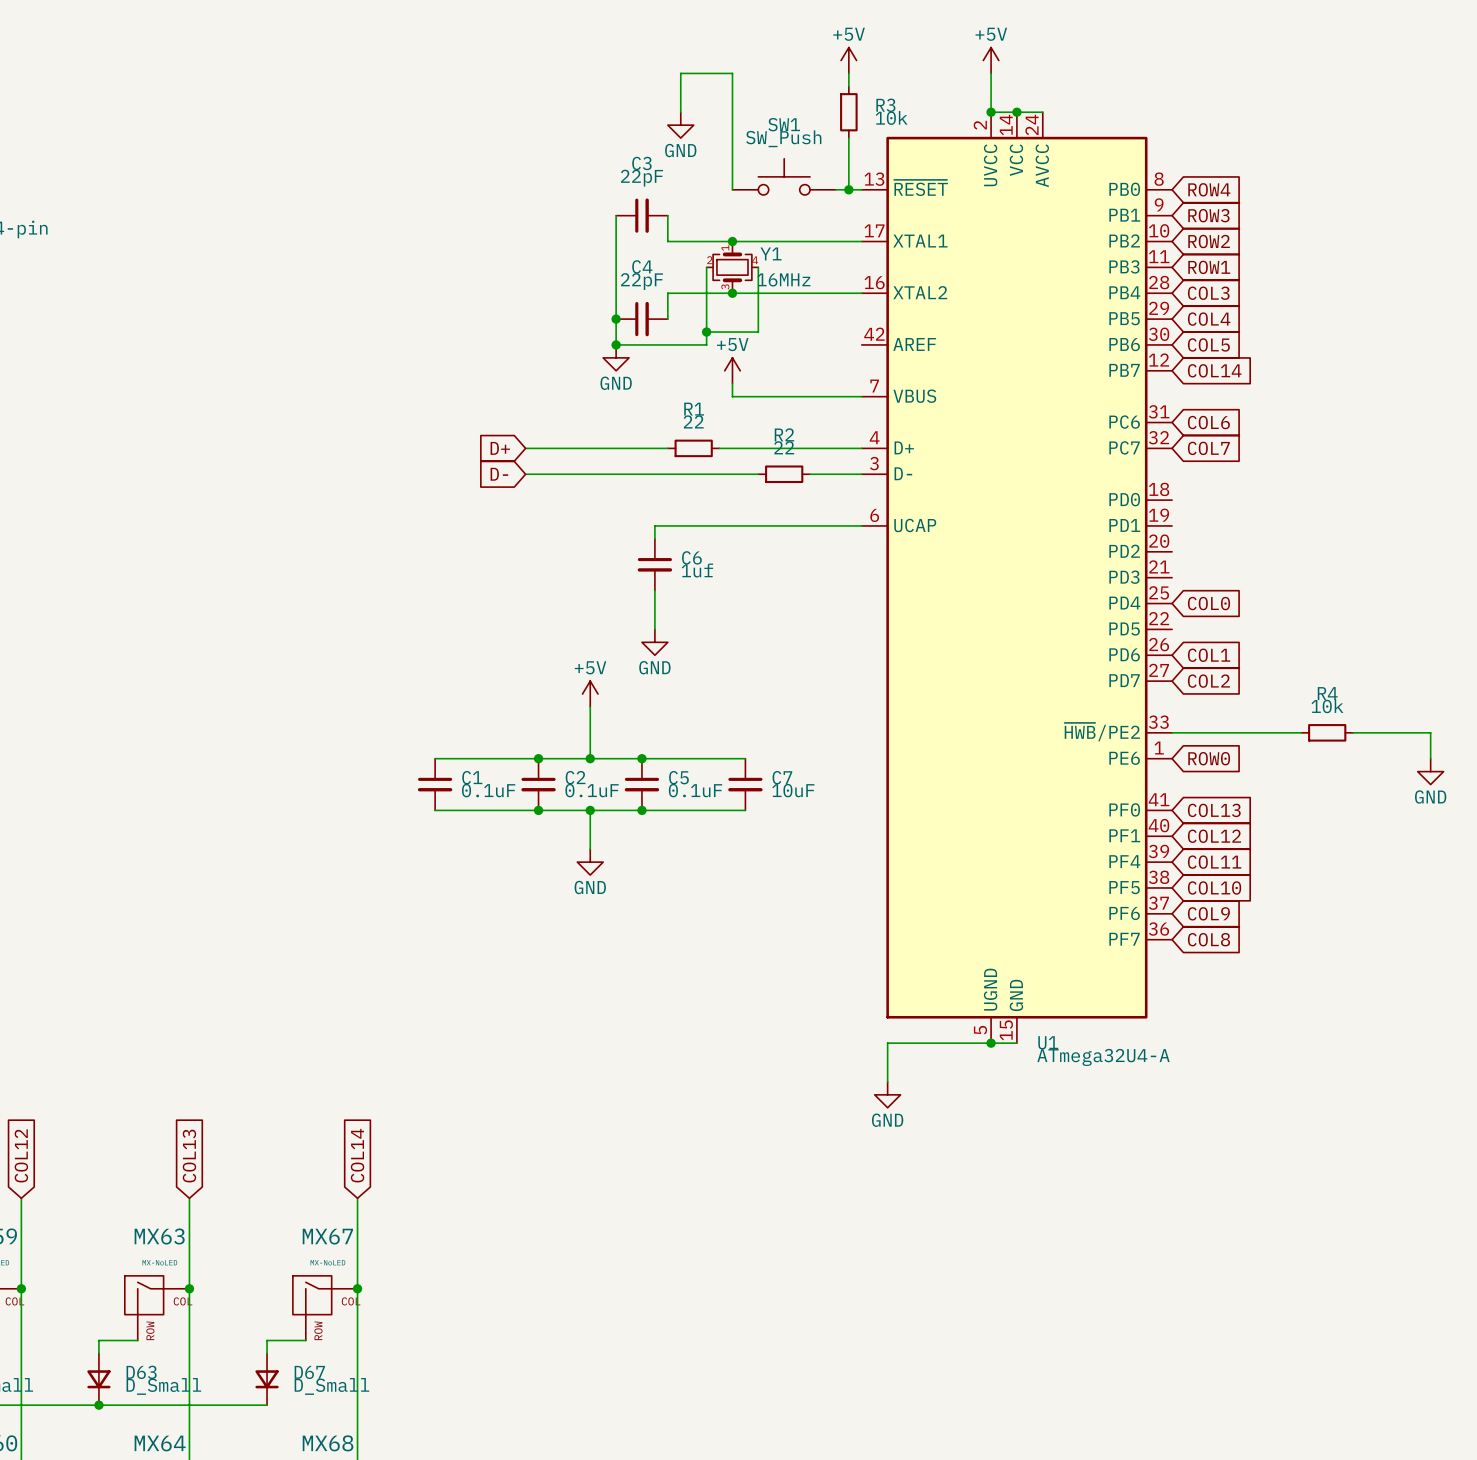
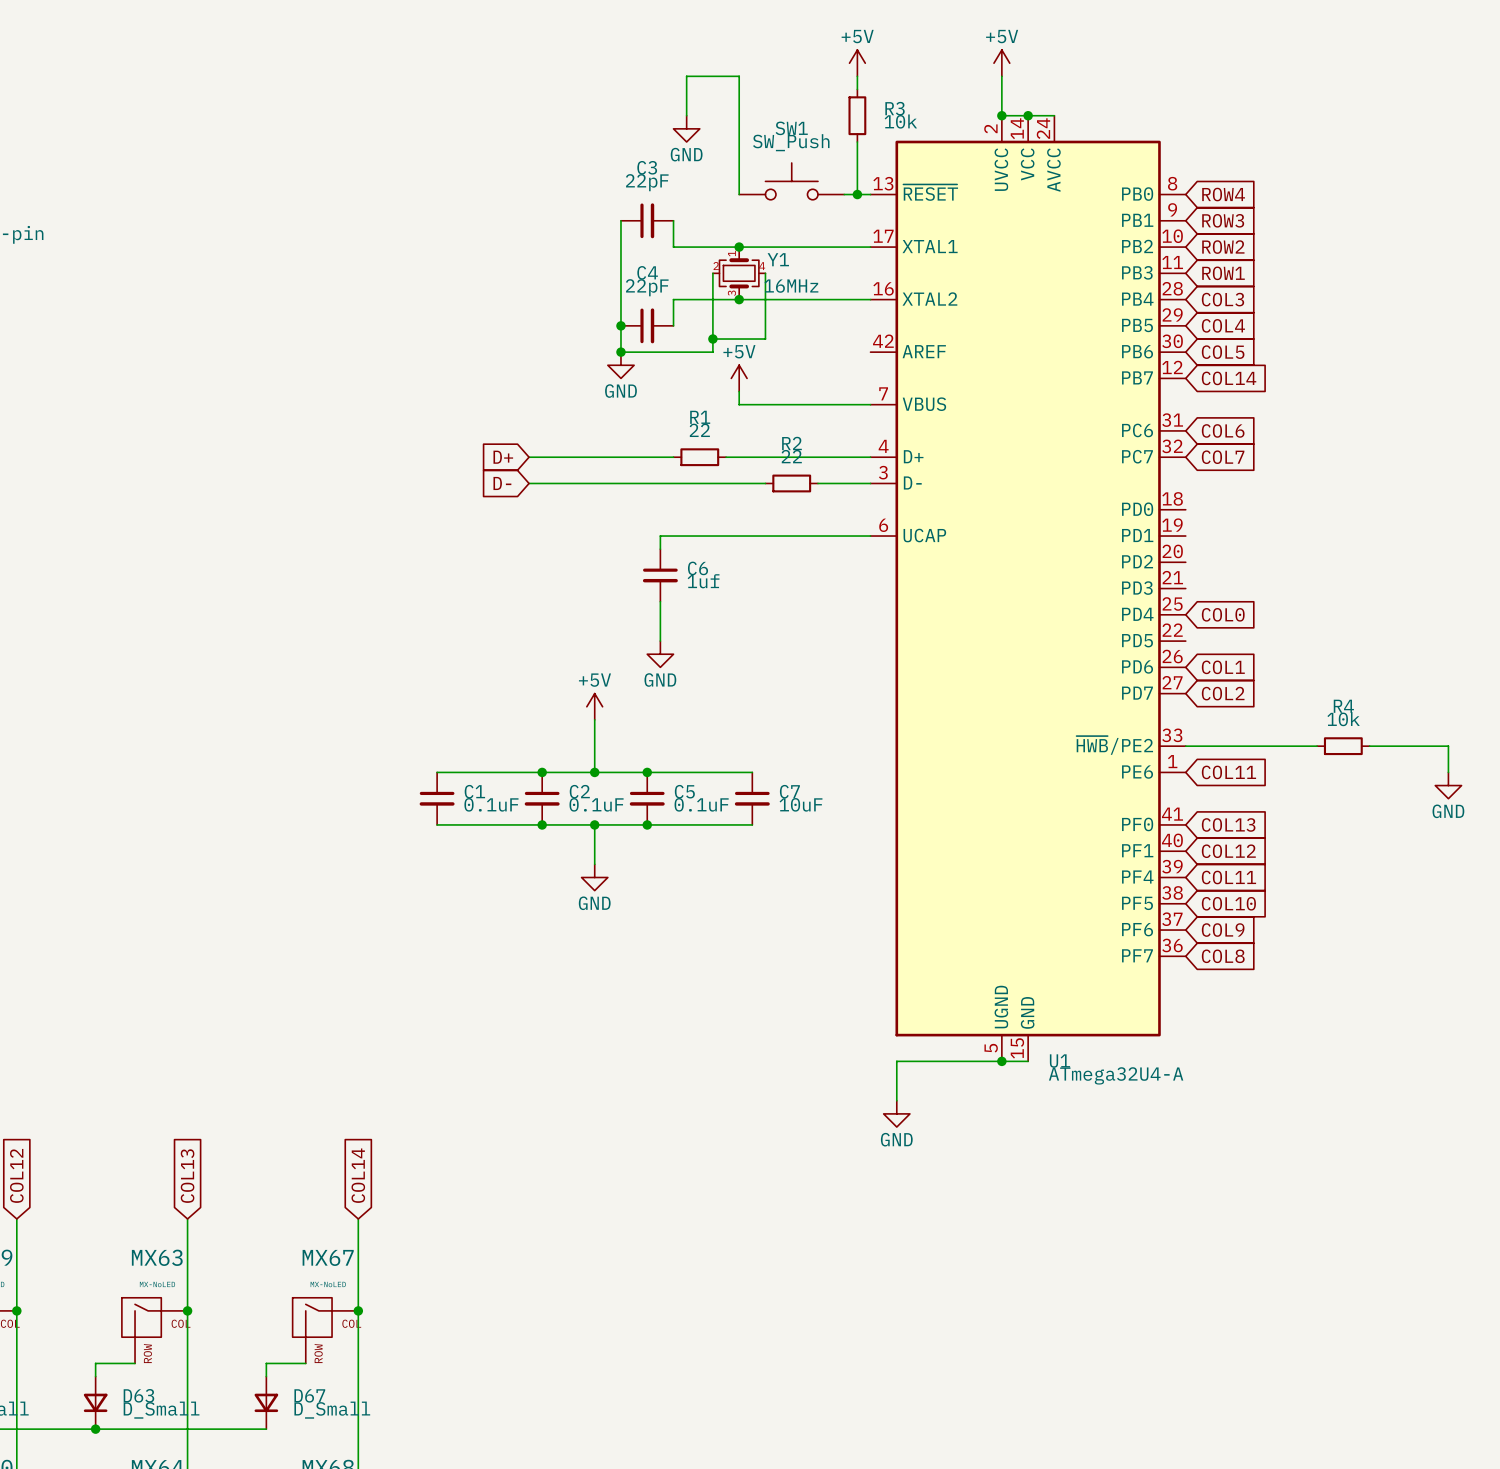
global label: ROW0 (1209, 758) -> COL11 (1228, 772)

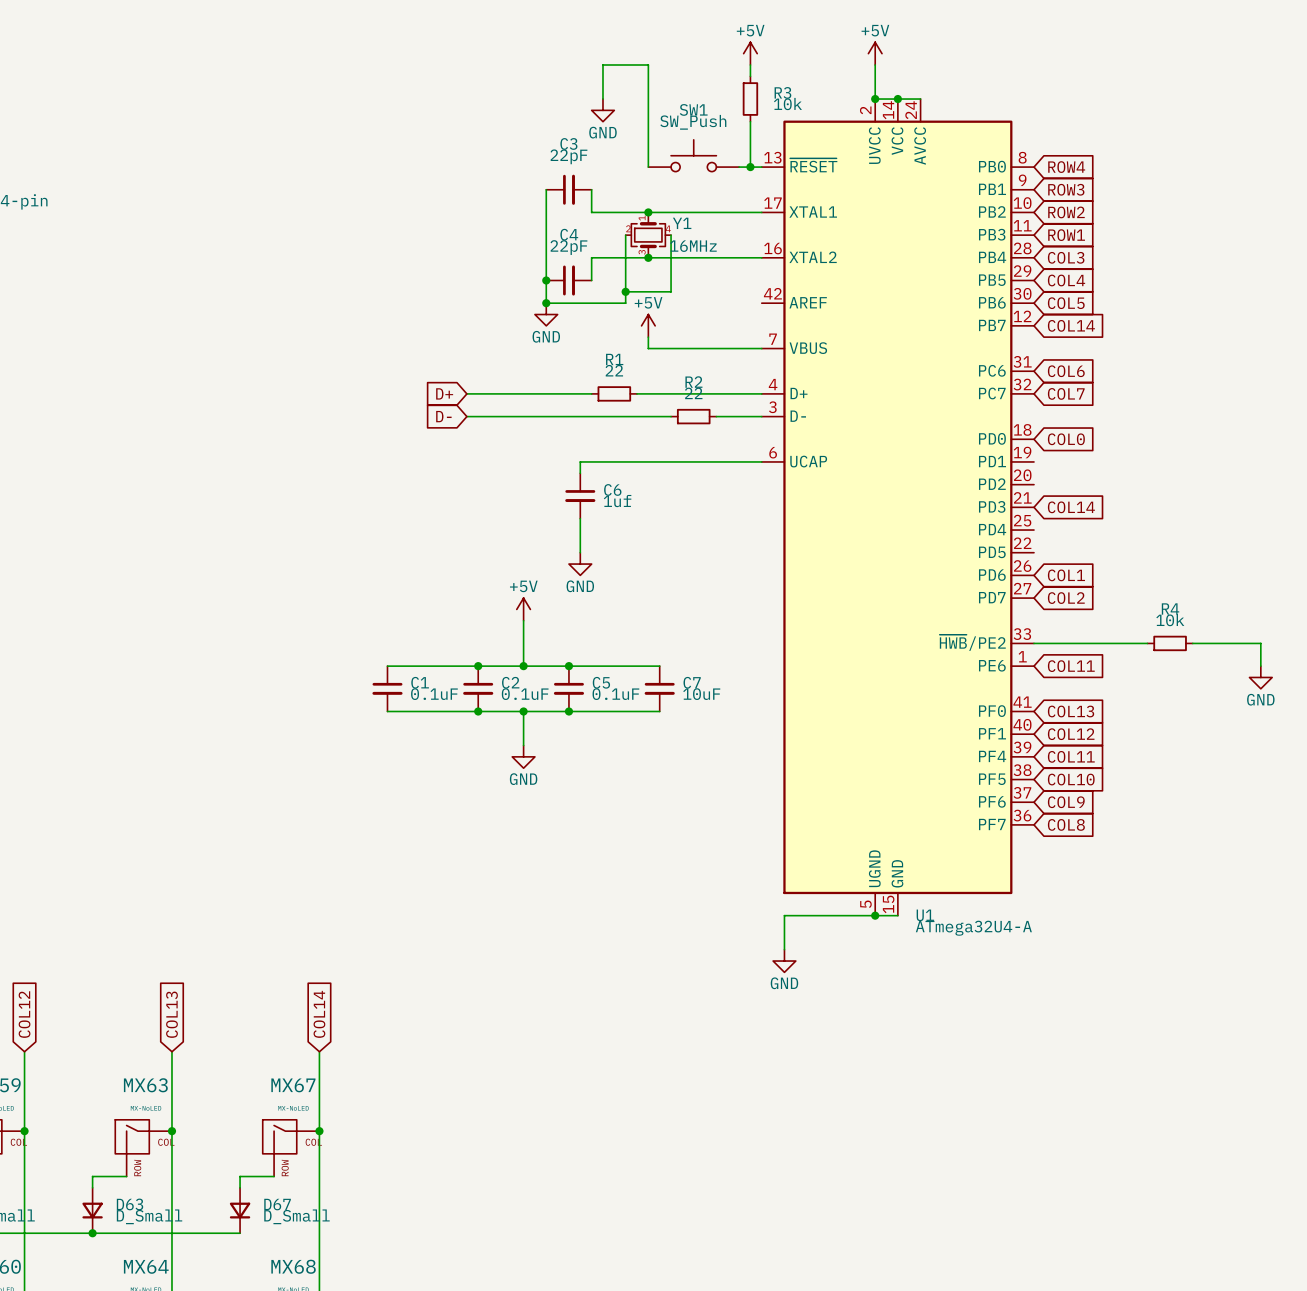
global label: none -> COL14 (1071, 507)
global label position: COL0 (1223, 614) -> COL0 (1066, 439)

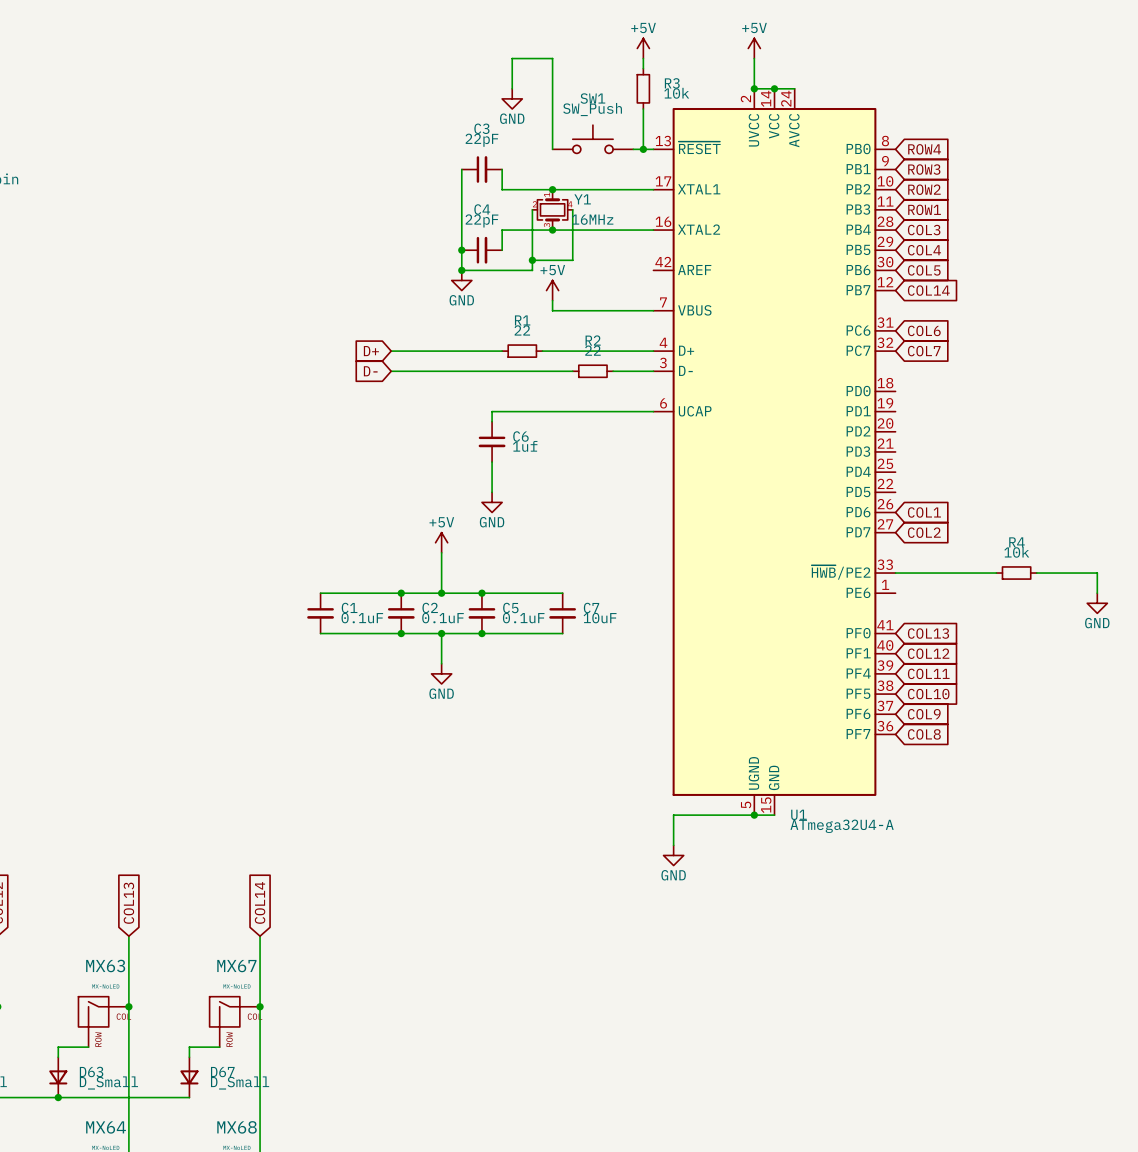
global label: COL0 (1066, 439) -> none
global label: COL14 (1071, 507) -> none
global label: COL11 (1071, 666) -> none

